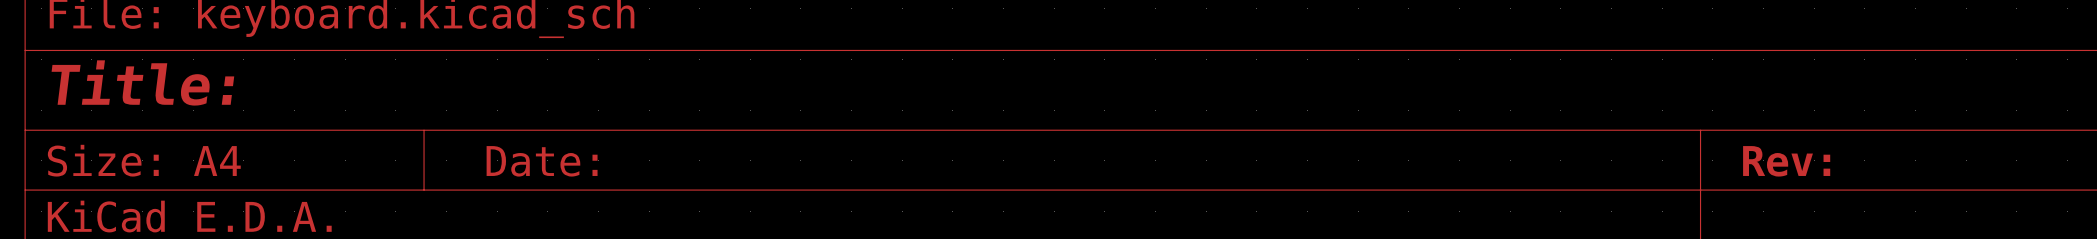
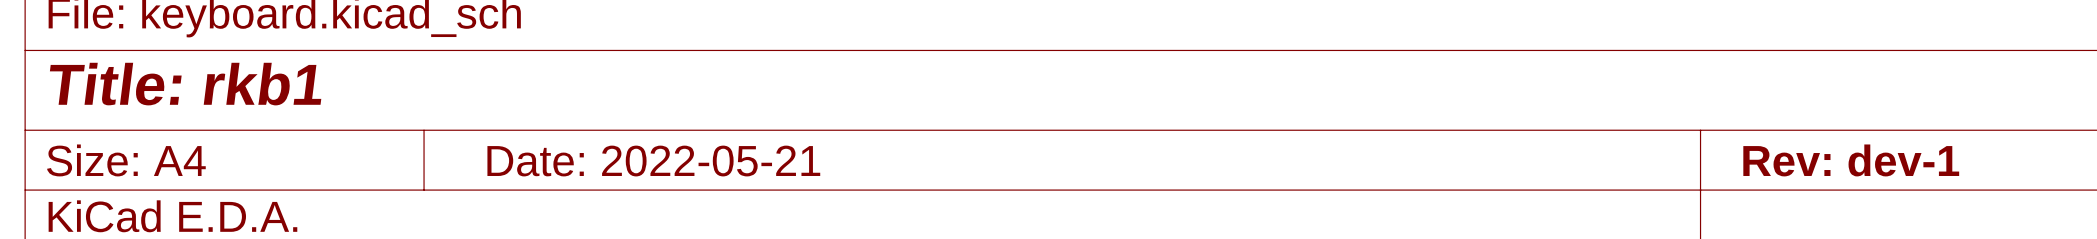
title block: Title: (142, 82) -> Title: rkb1 (185, 84)
title block: Date: (542, 161) -> Date: 2022-05-21 (653, 161)
title block: Rev: (1786, 161) -> Rev: dev-1 (1851, 160)

